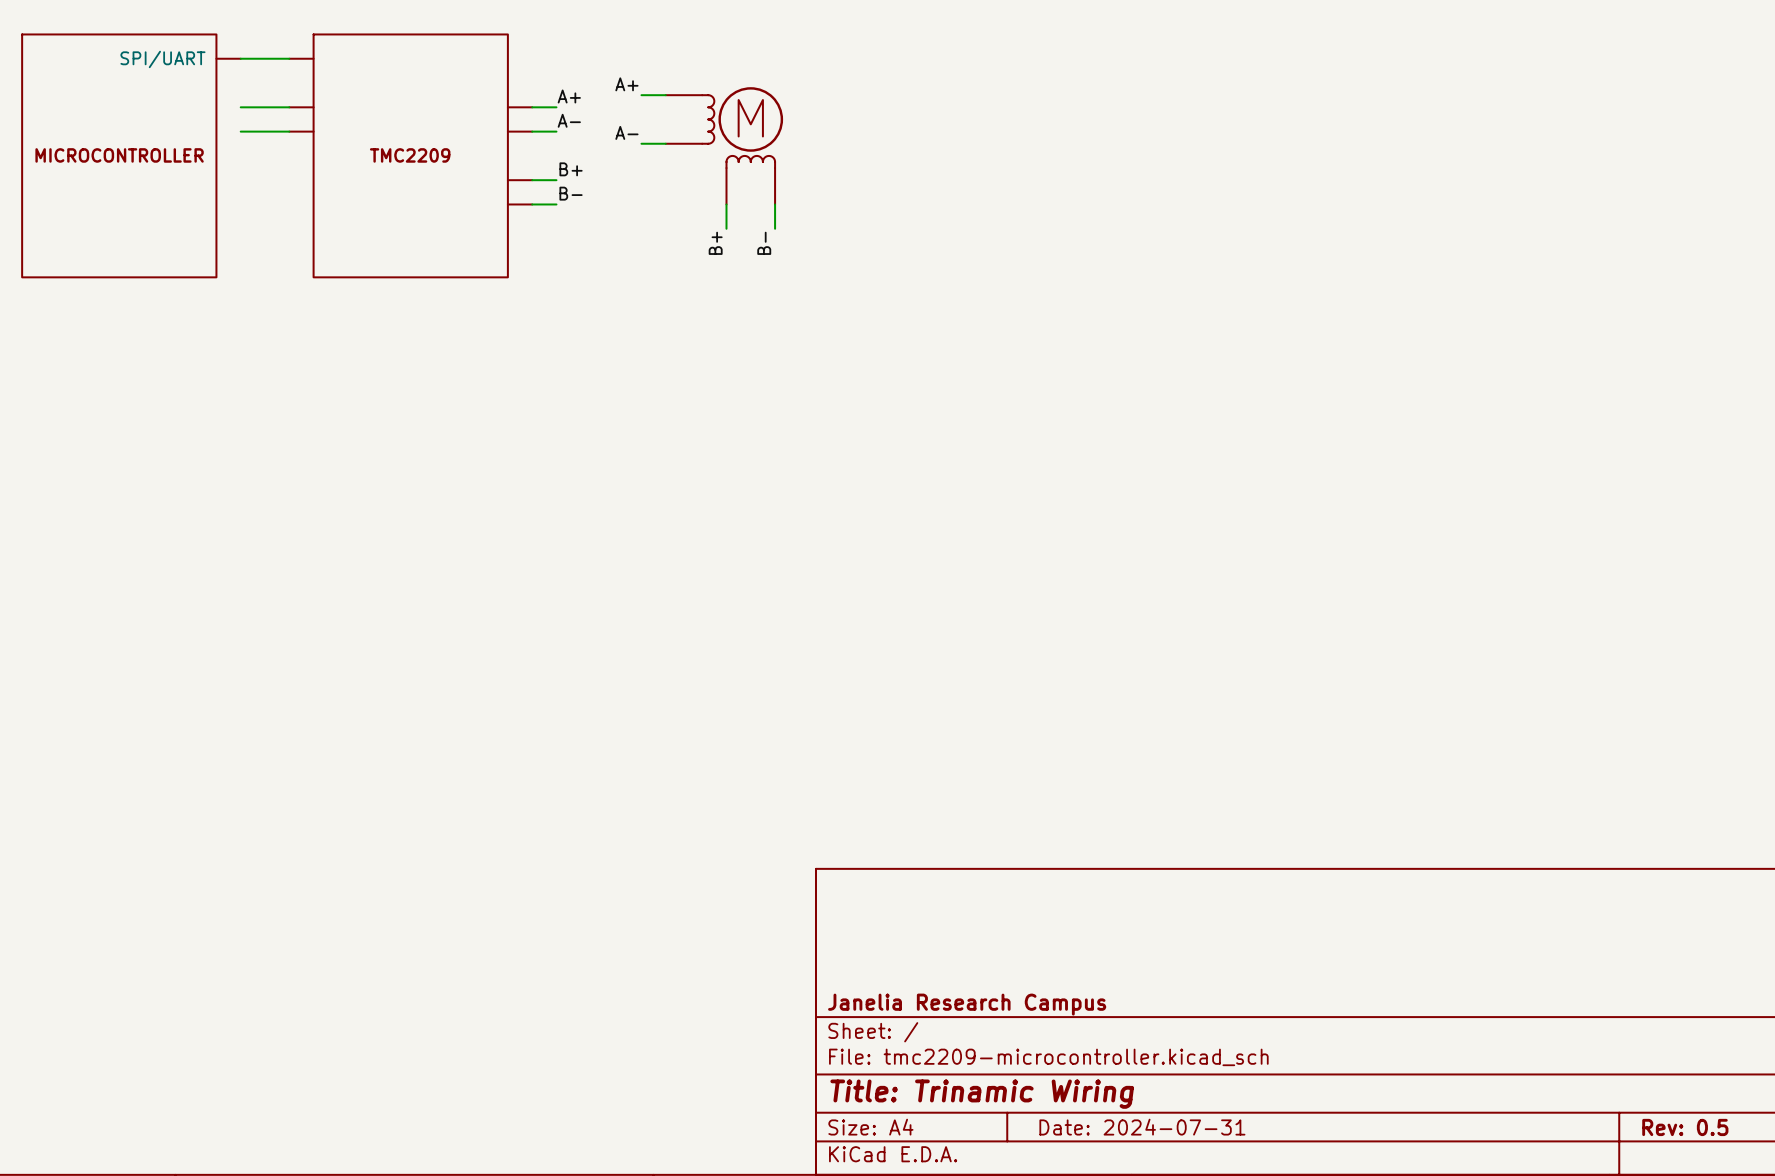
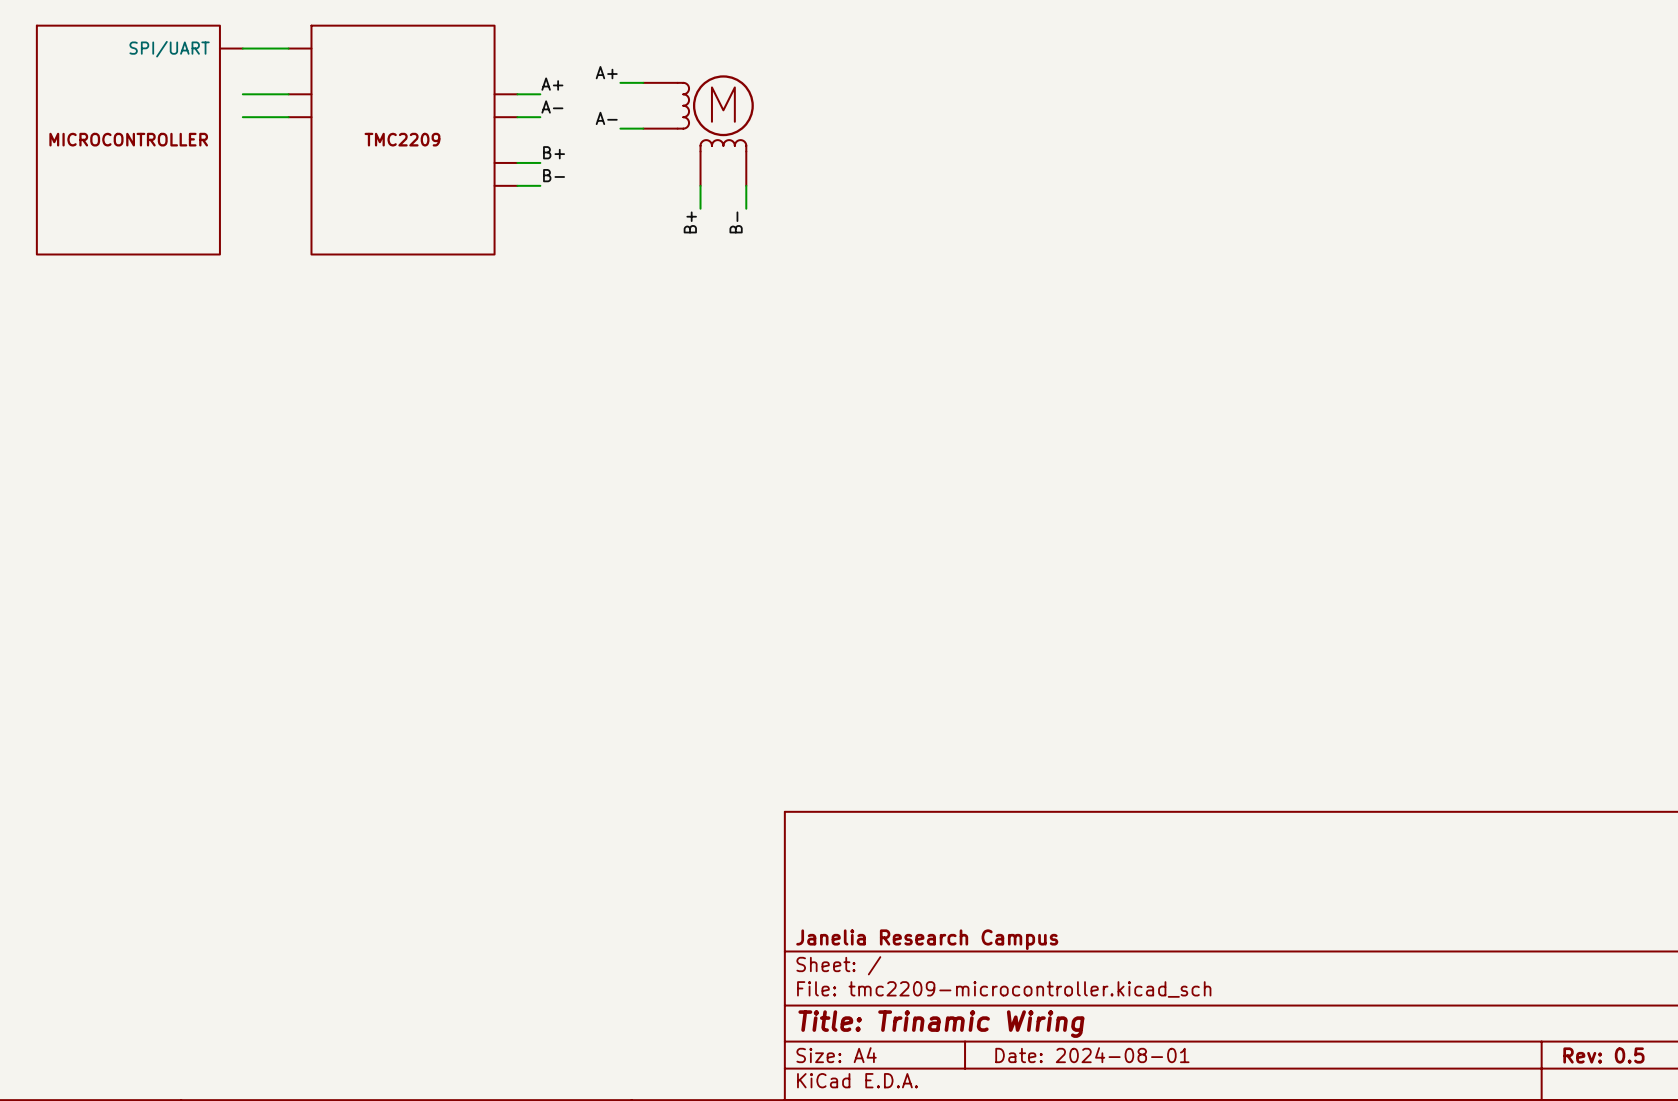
title block: Date: 2024-07-31 (1142, 1127) -> Date: 2024-08-01 (1092, 1055)

